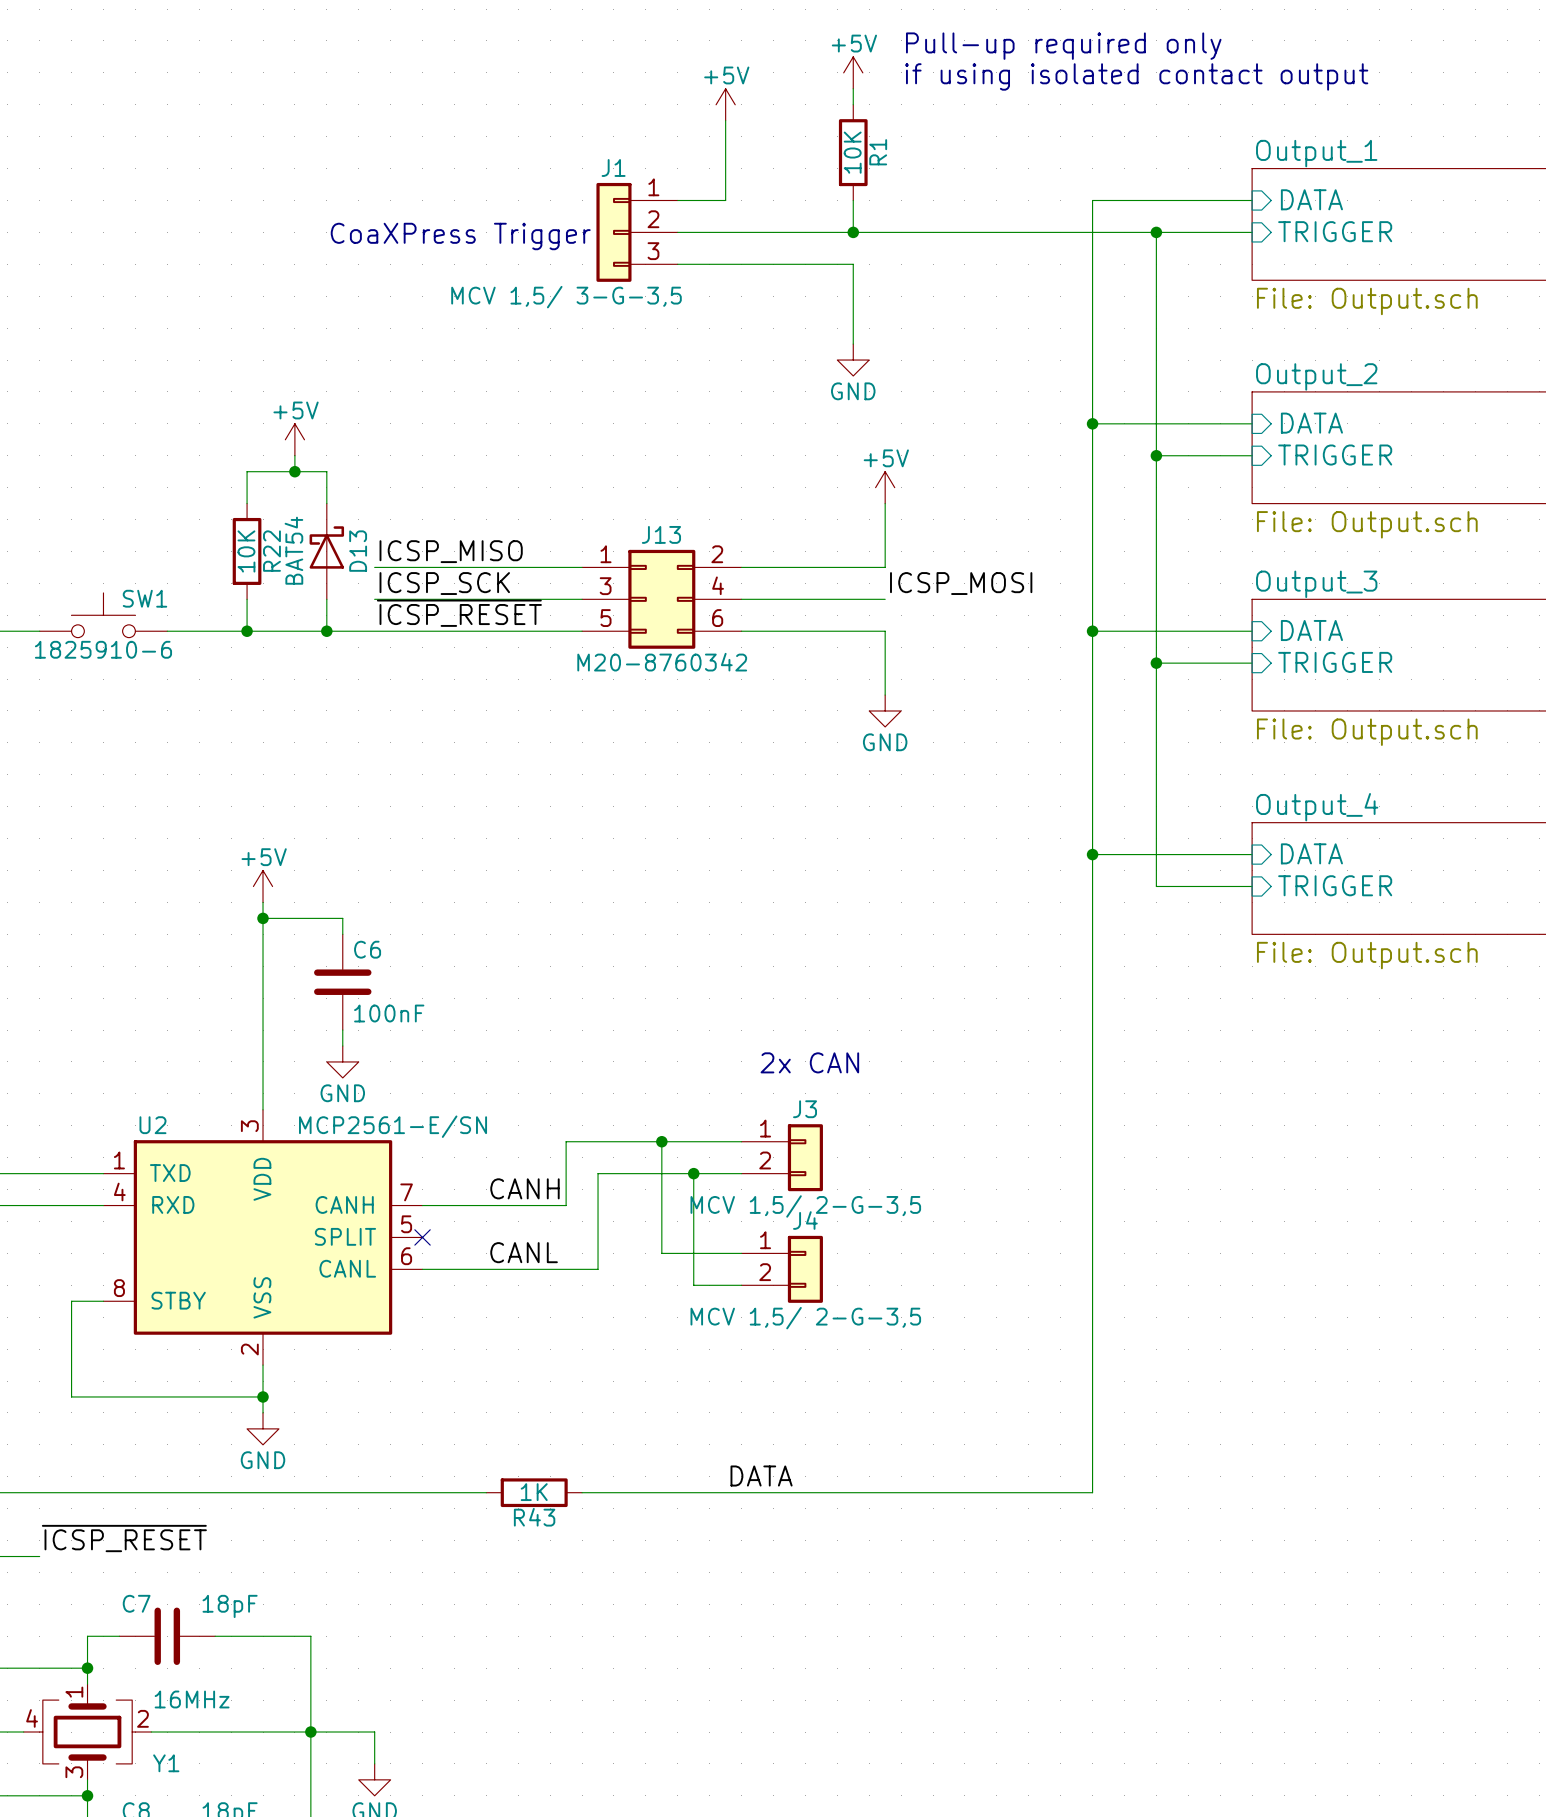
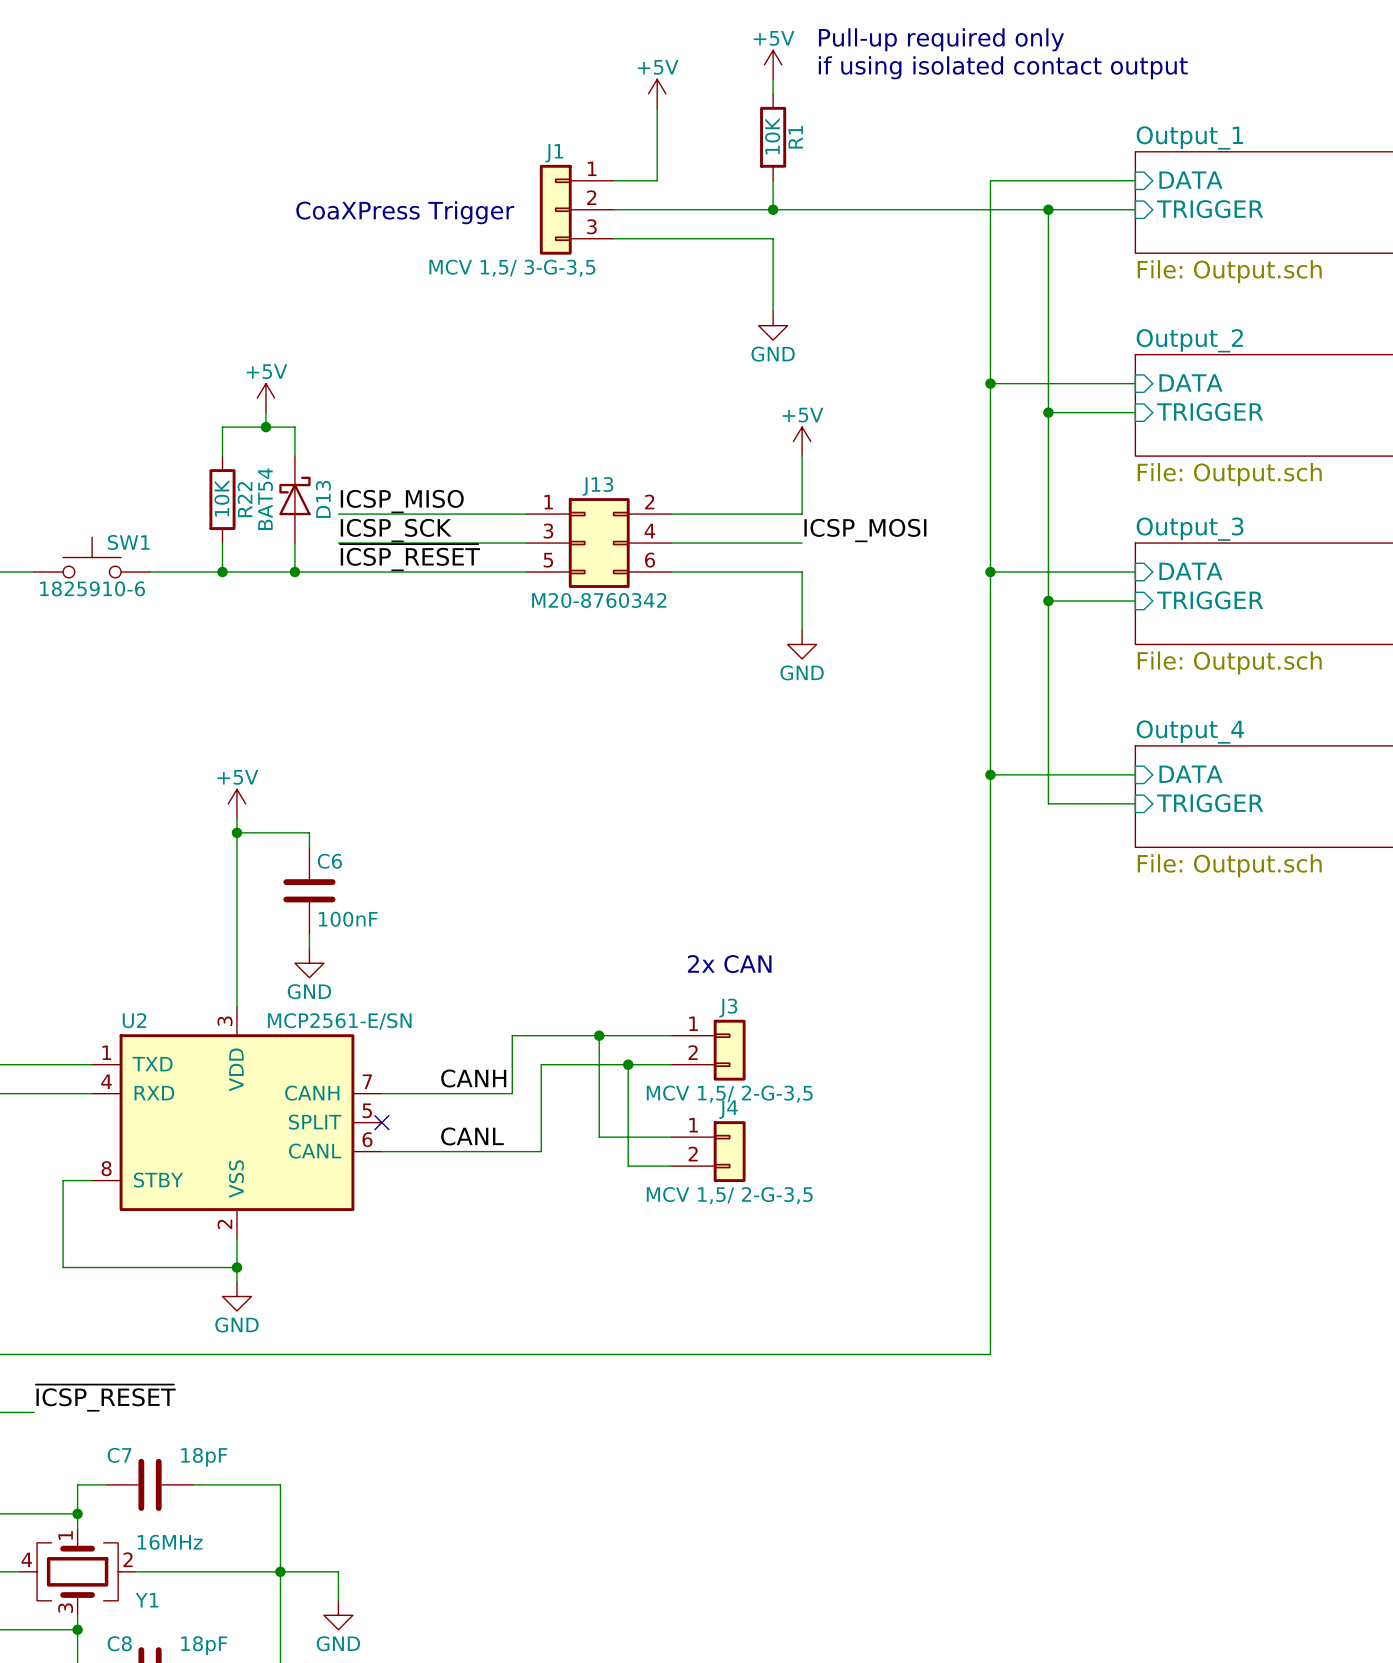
label: DATA (761, 1476) -> none
wire: none -> (439, 1354) (526, 1354)
R43: 1K (534, 1492) -> none

